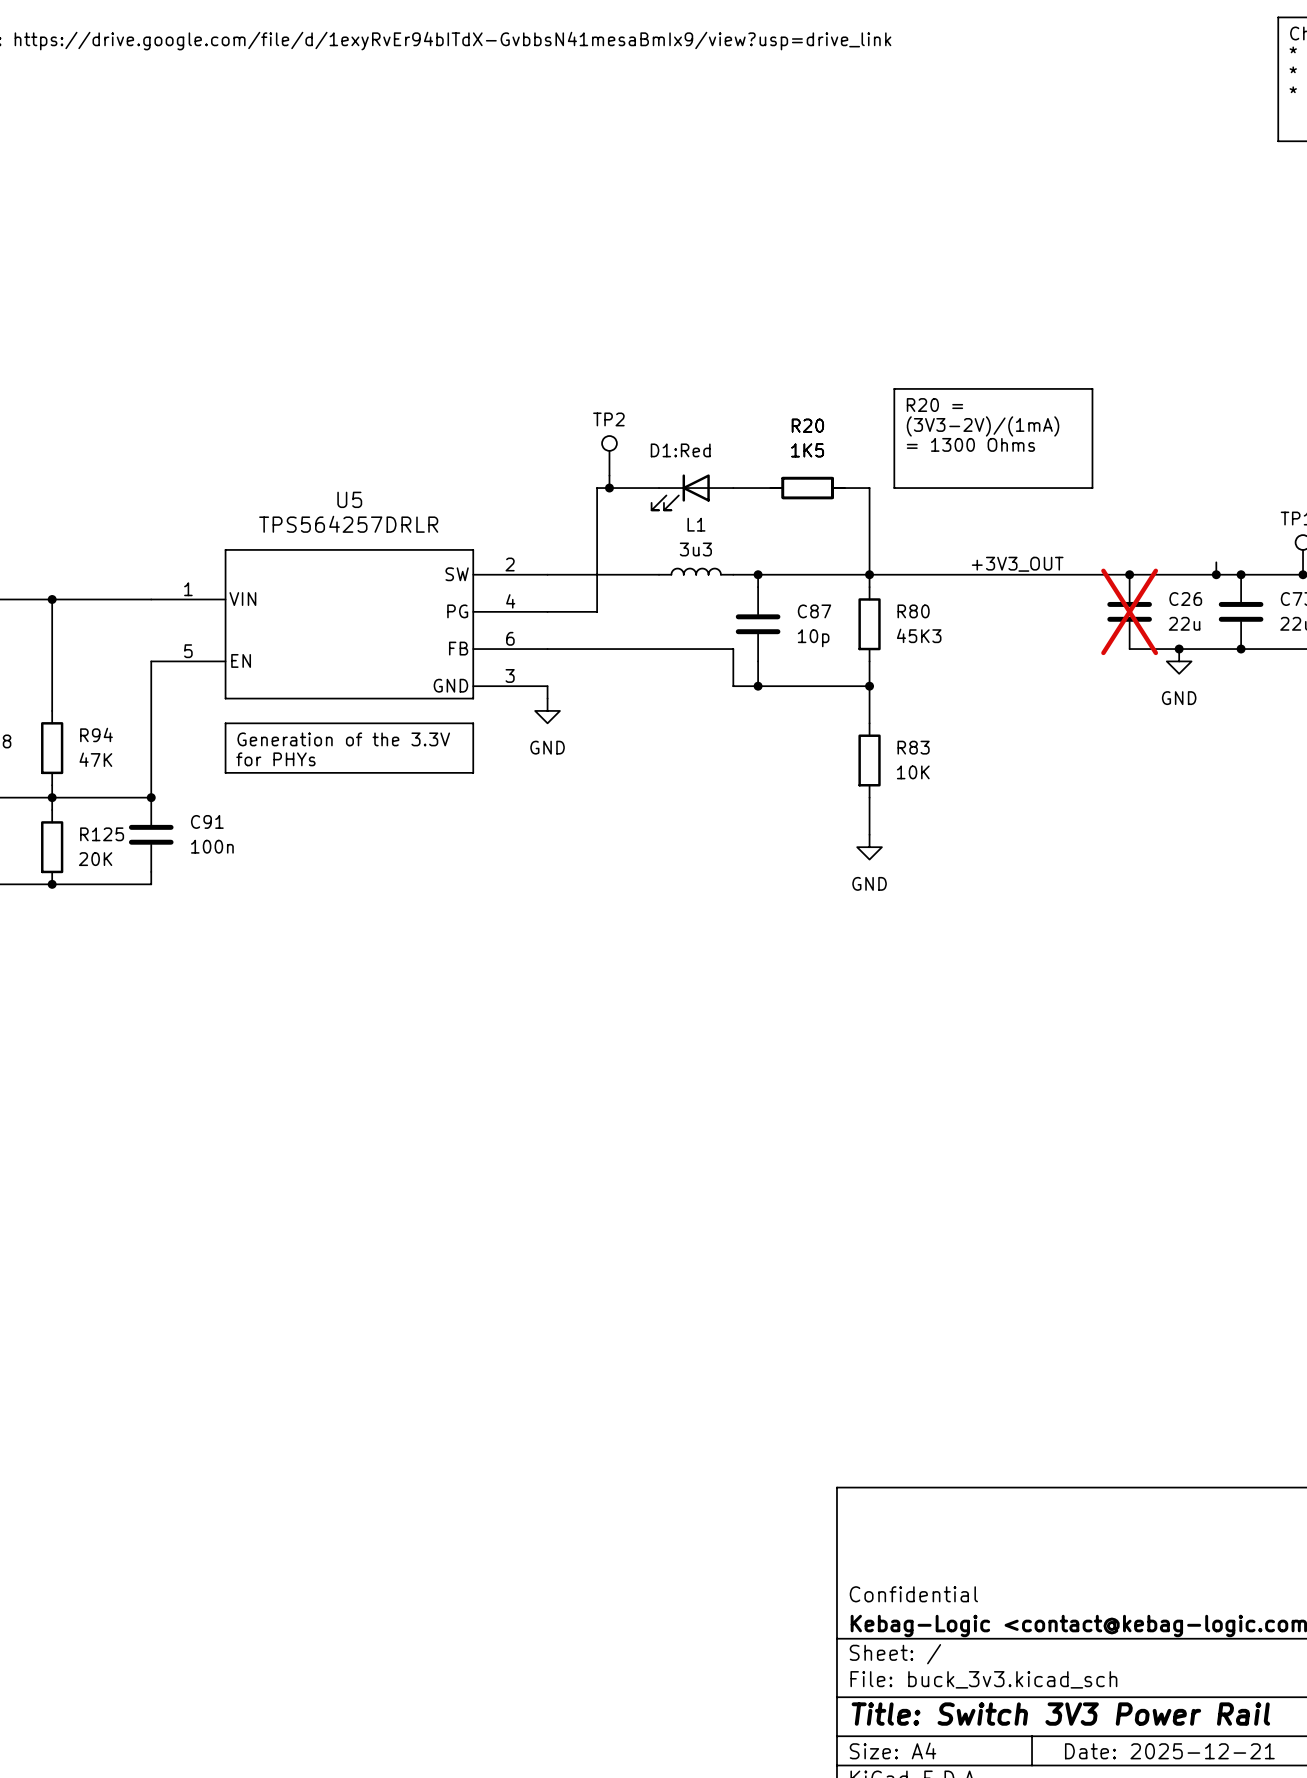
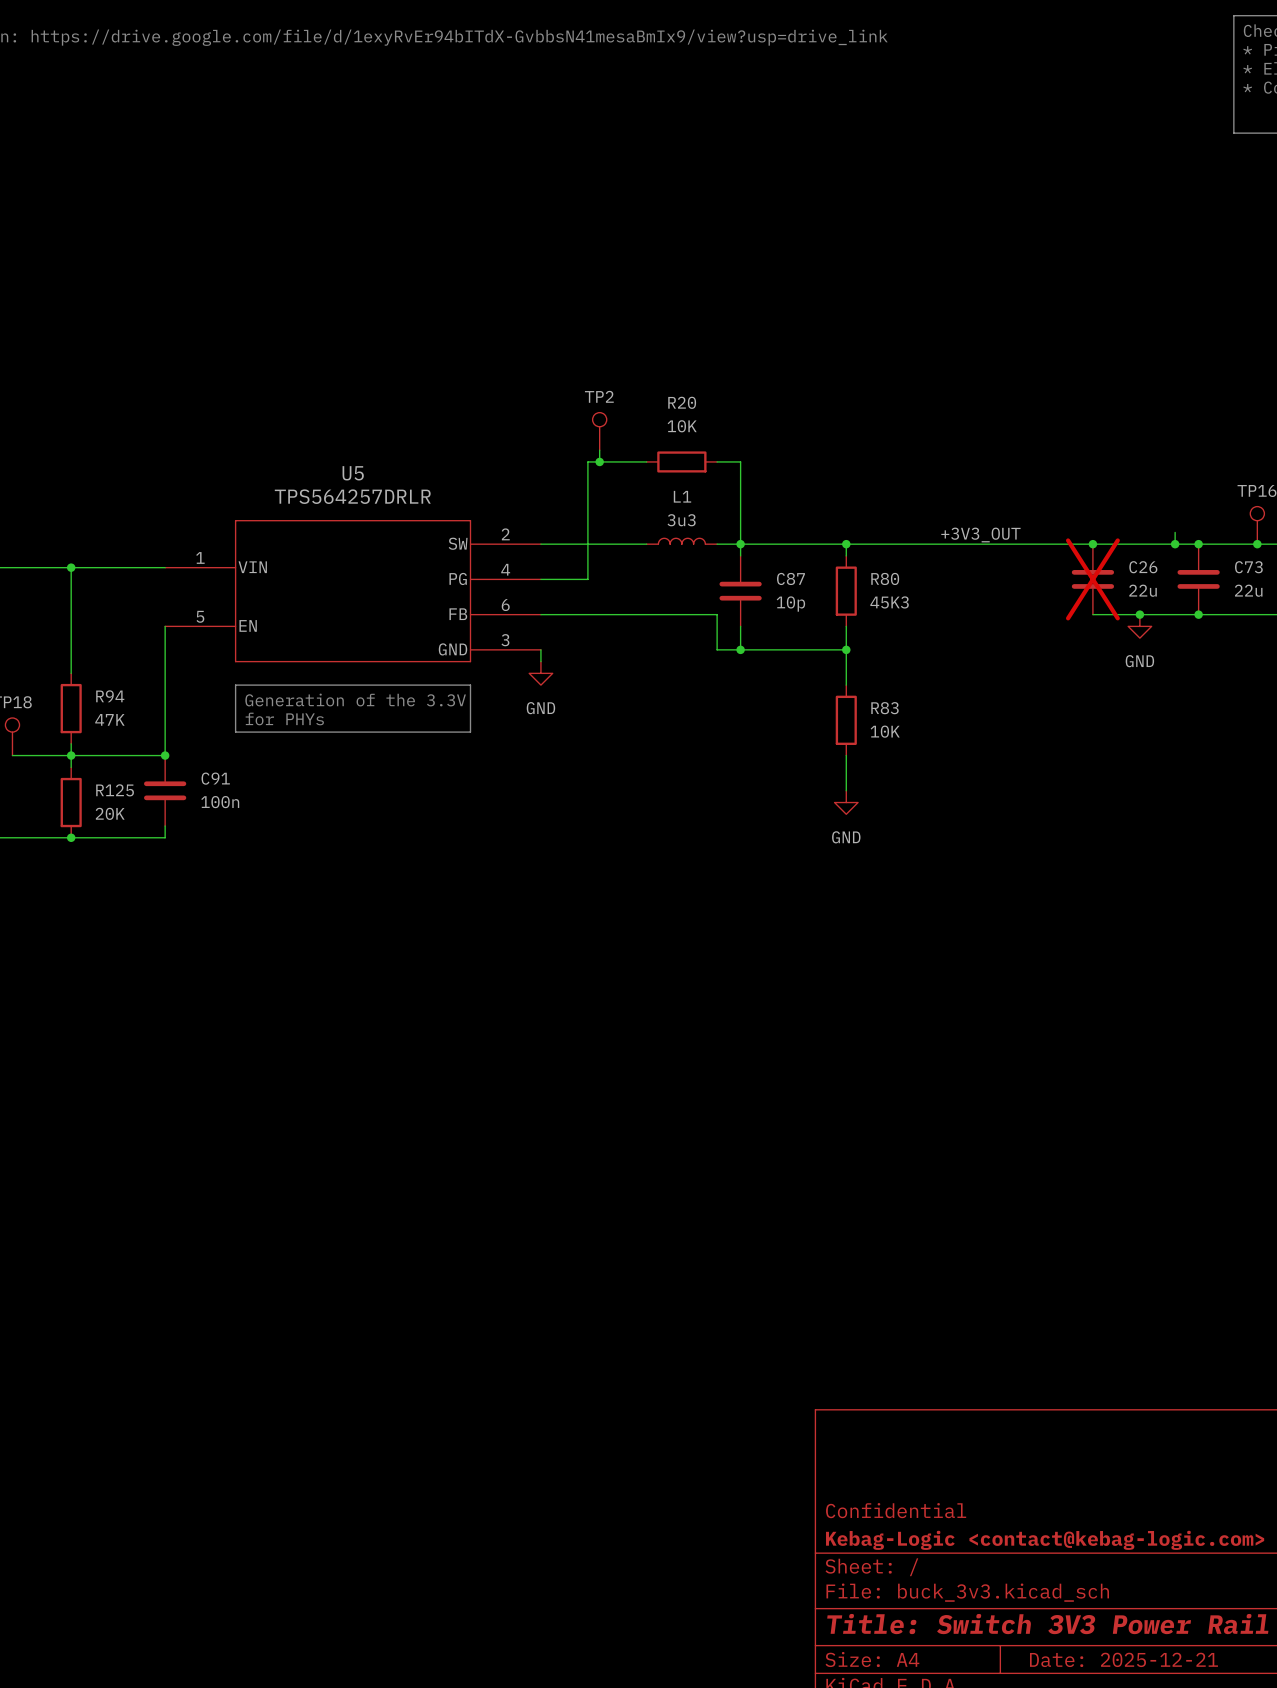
line: (894, 388) (1092, 388) (1092, 488) (894, 488) (894, 388) -> none
text: R20 = (934, 405) -> none
text: (3V3-2V)/(1mA) (983, 426) -> none
text: = 1300 Ohms (970, 444) -> none
R20: none -> 10K (681, 461)
wire: (758, 488) (770, 488) -> (740, 461) (740, 544)
R20: 1K5 (807, 488) -> none
wire: (844, 488) (869, 488) (869, 574) -> none
part: (692, 492) -> none

